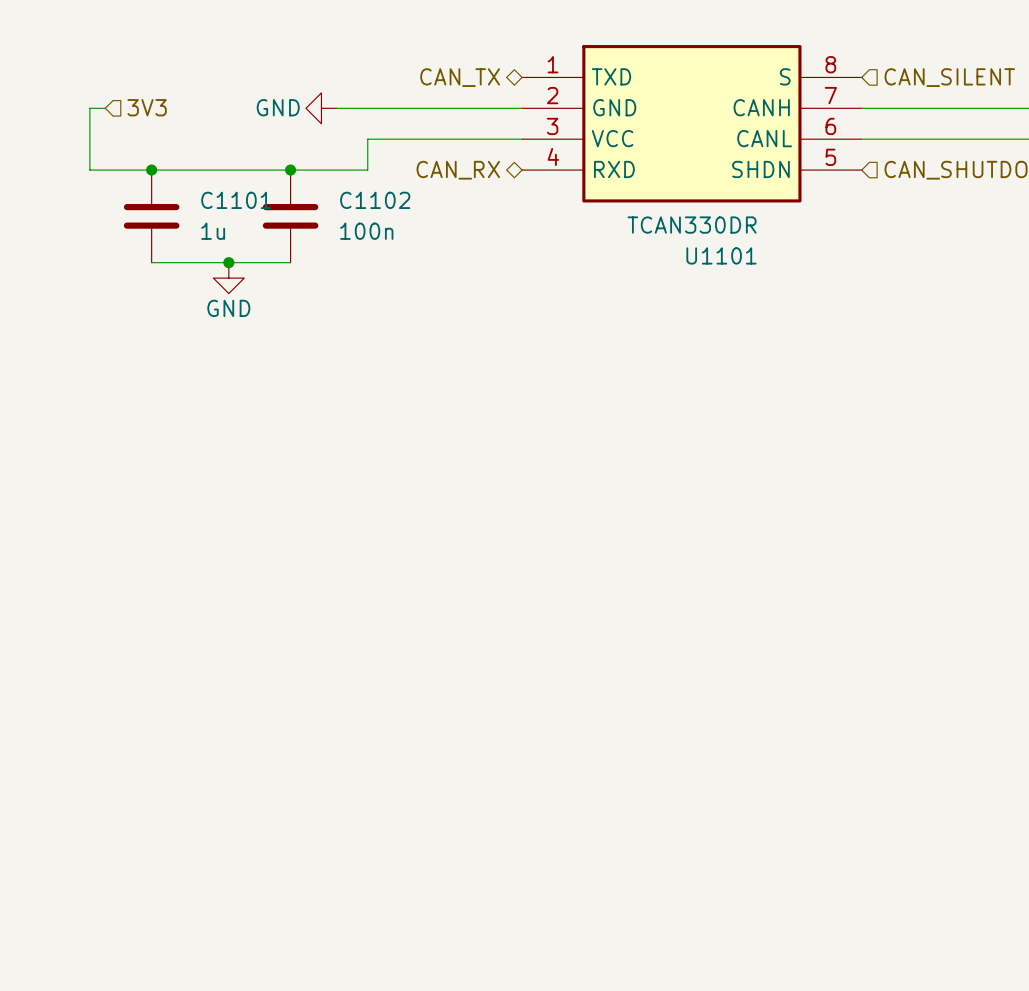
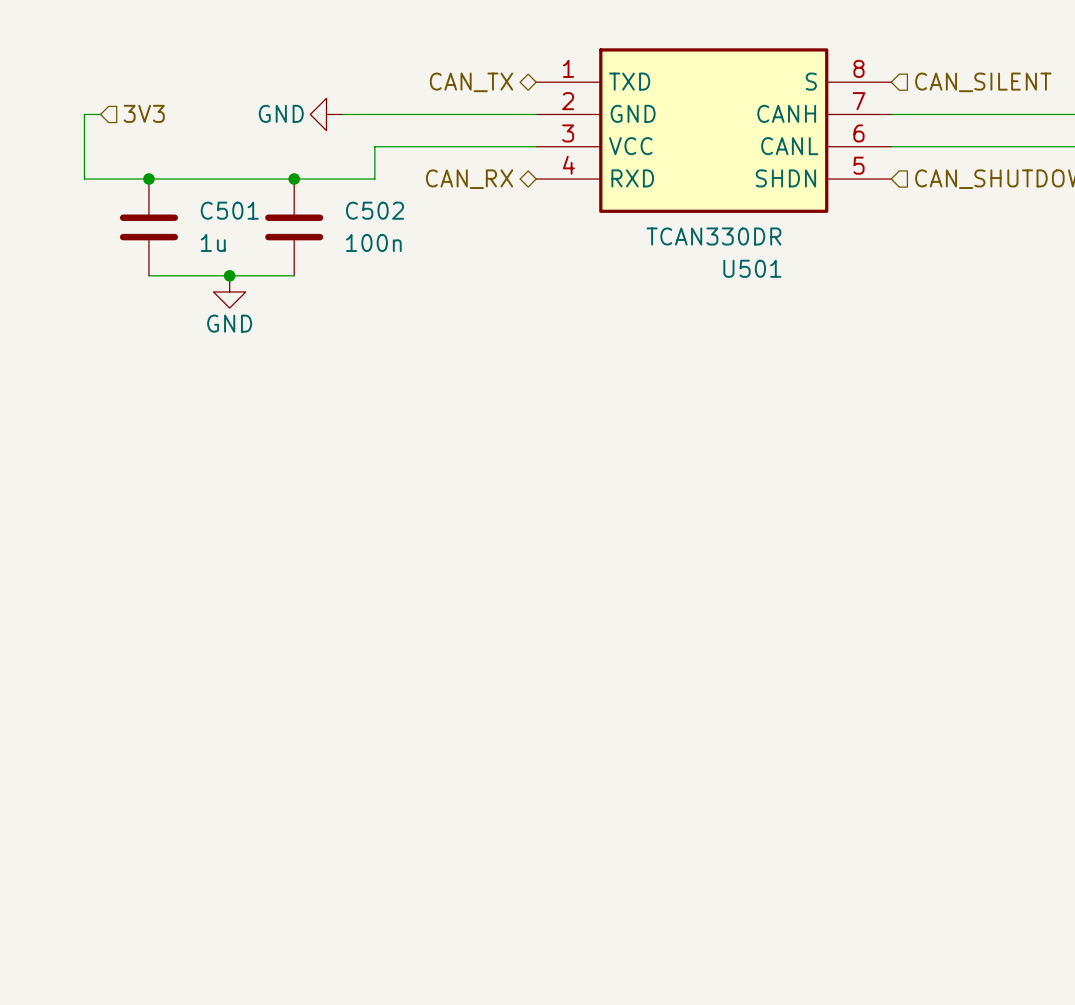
C1101 name: C1101 (236, 200) -> C501 (229, 210)
C1102 name: C1102 (375, 200) -> C502 (375, 210)
U1101 name: U1101 (721, 255) -> U501 (752, 268)

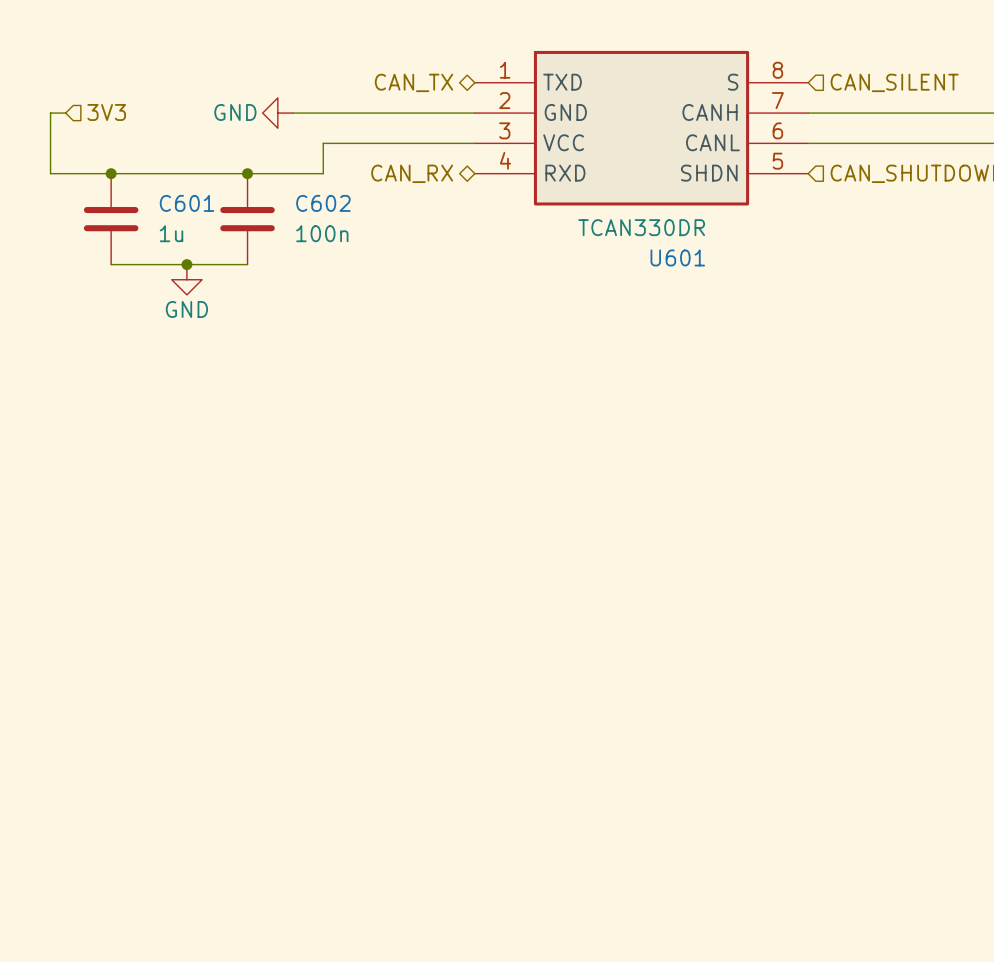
C501 name: C501 (229, 210) -> C601 (187, 203)
C502 name: C502 (375, 210) -> C602 (323, 203)
U501 name: U501 (752, 268) -> U601 (677, 257)

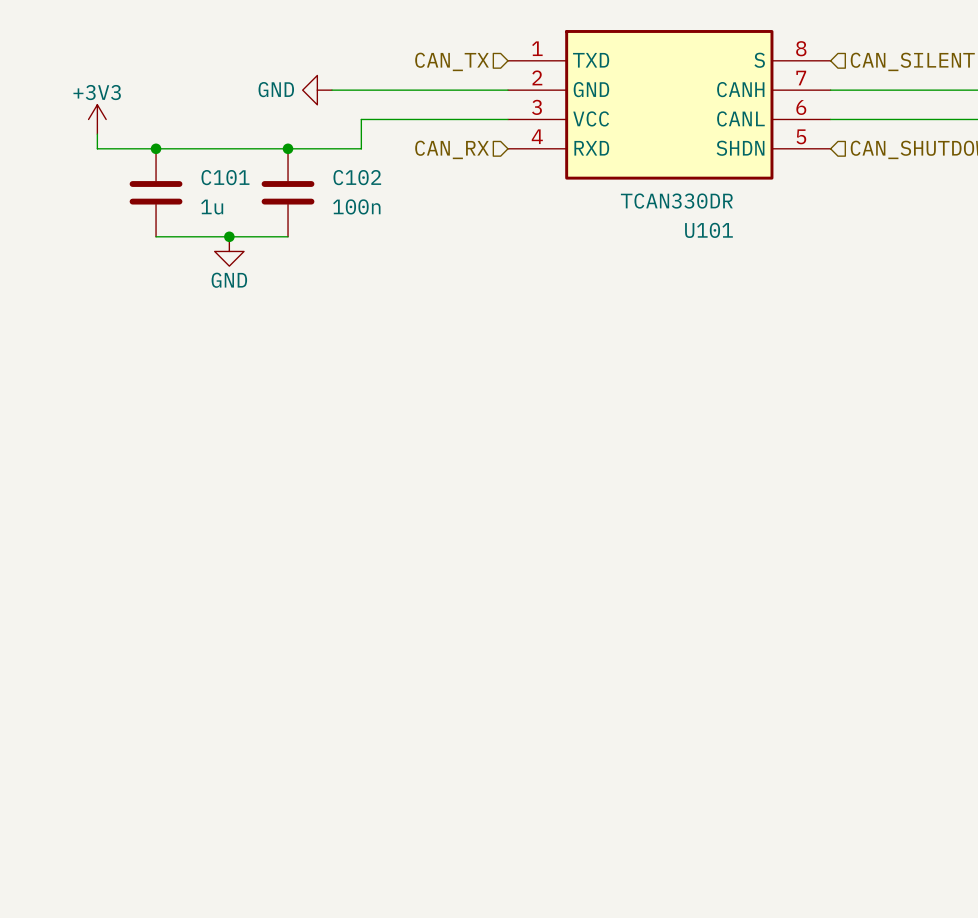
hierarchical label shape: bidirectional (413, 82) -> input (452, 61)
hierarchical label: 3V3 (106, 112) -> none
power symbol: none -> +3V3 (97, 119)
hierarchical label shape: bidirectional (412, 173) -> input (452, 149)
C601 name: C601 (187, 203) -> C101 (225, 177)
C602 name: C602 (323, 203) -> C102 (357, 177)
U601 name: U601 (677, 257) -> U101 (708, 230)

